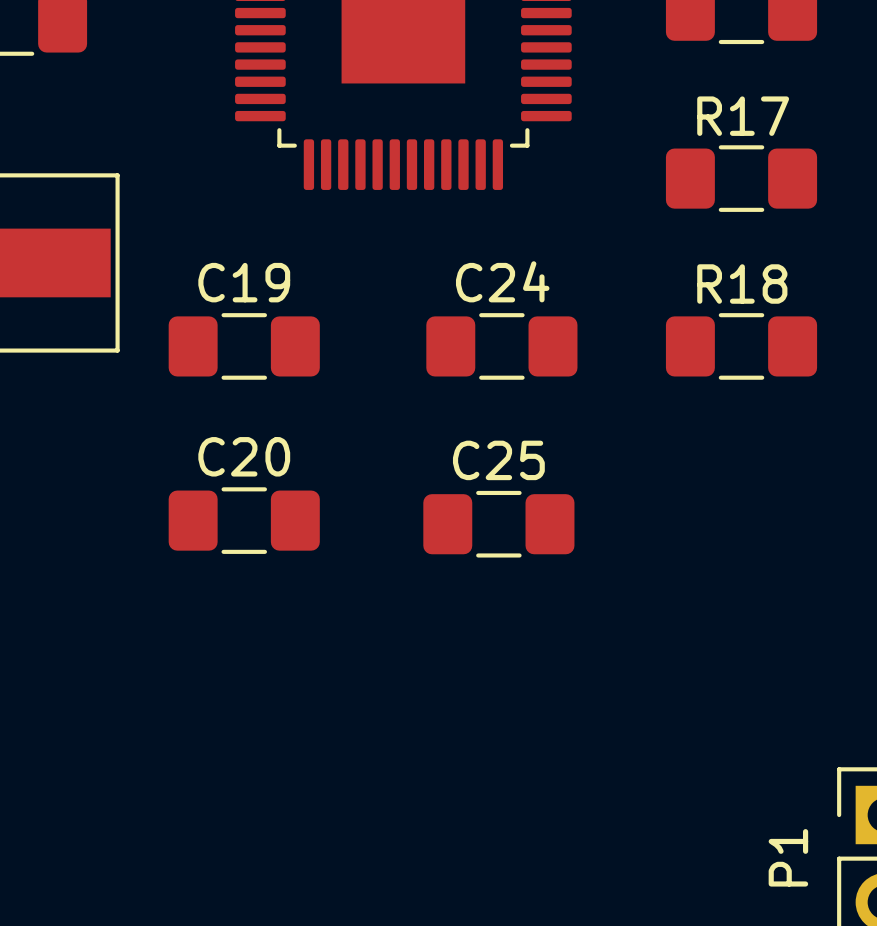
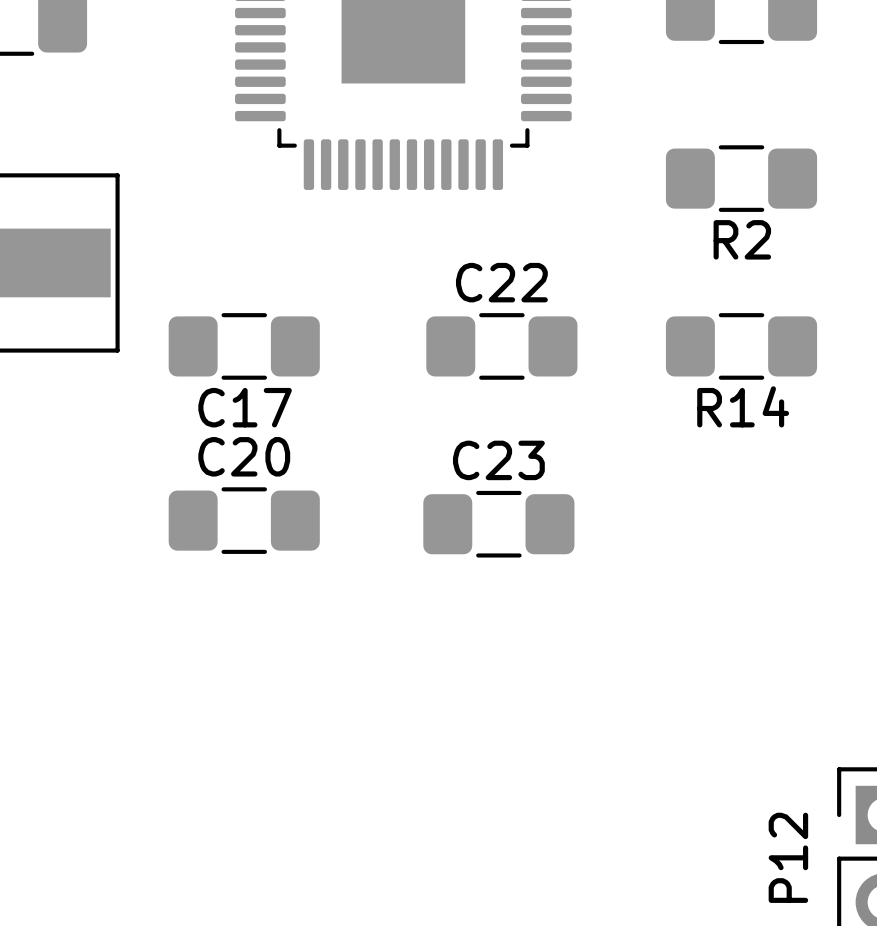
R17 name: R17 (743, 116) -> R2 (742, 239)
C24 name: C24 (502, 281) -> C22 (501, 282)
C19 name: C19 (244, 282) -> C17 (245, 407)
R18 name: R18 (742, 284) -> R14 (743, 406)
C25 name: C25 (498, 460) -> C23 (498, 460)
P1 name: P1 (788, 857) -> P12 (788, 857)

